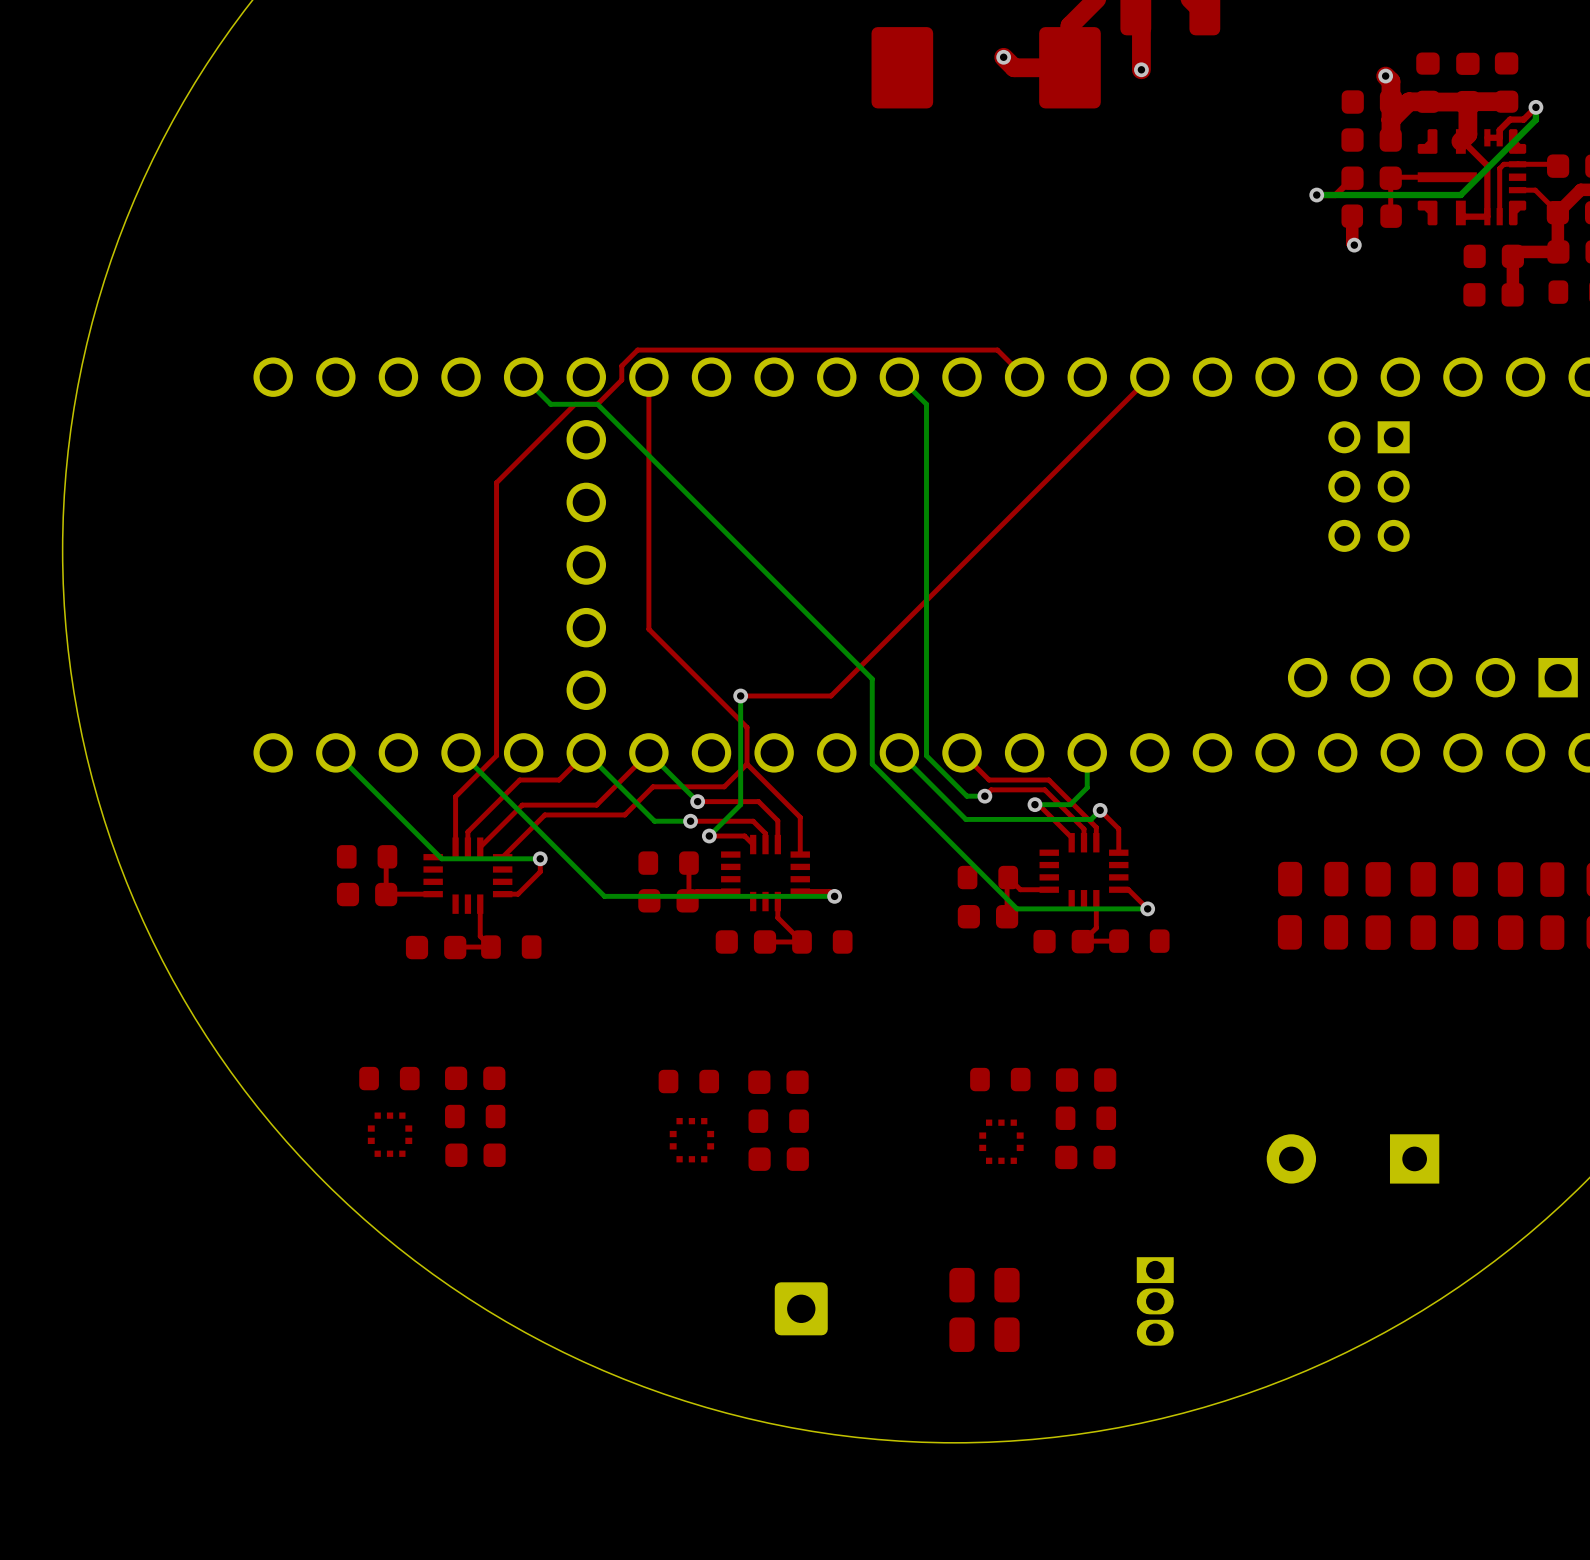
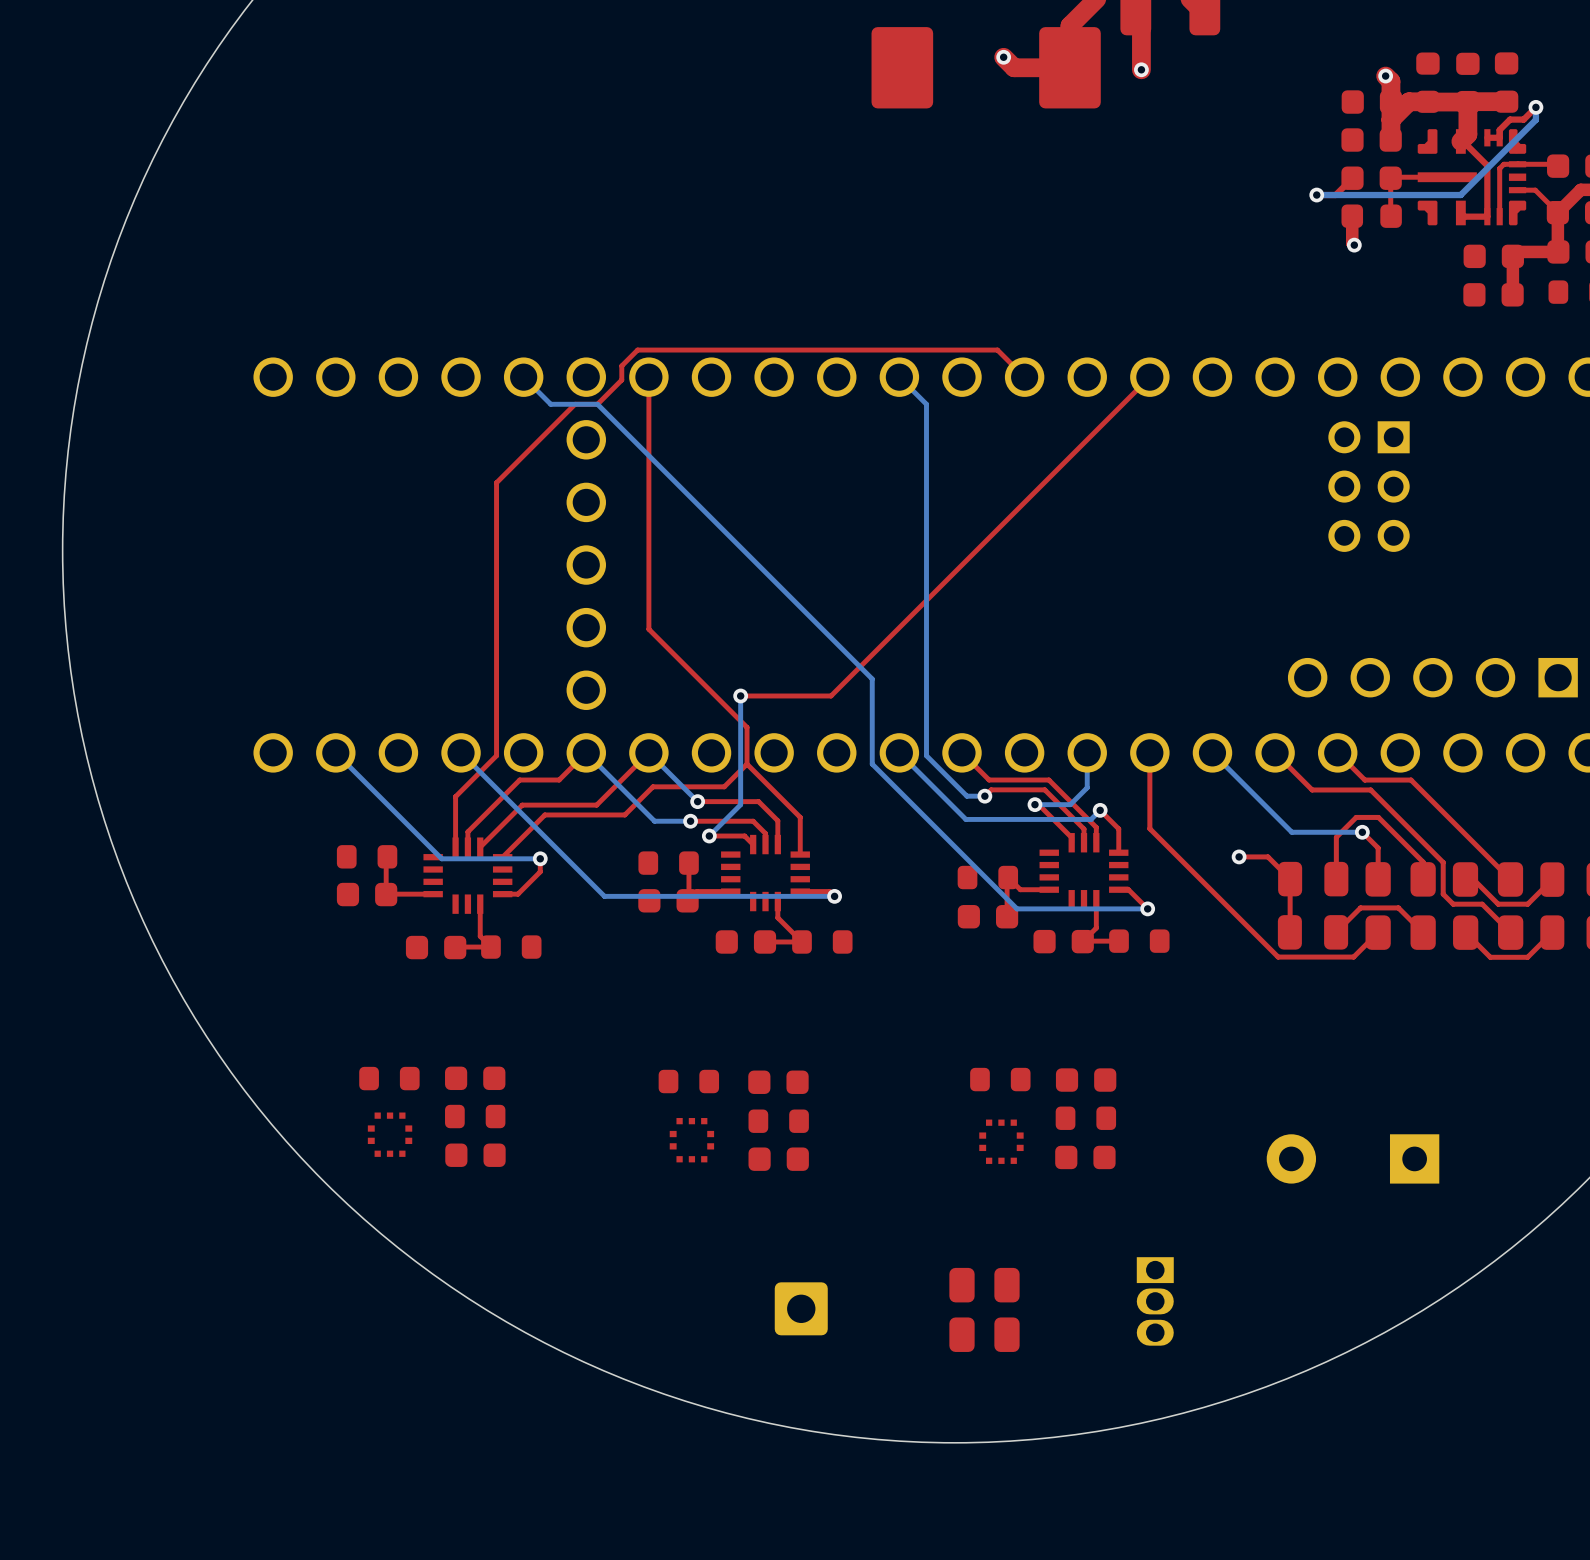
top track: none -> (1149, 752) (1149, 828) (1278, 957) (1353, 957) (1378, 932)
bottom track: none -> (1212, 752) (1291, 832) (1362, 832)
top track: none -> (1275, 752) (1312, 789) (1370, 789) (1443, 862) (1443, 894) (1453, 904) (1482, 904) (1510, 932)
top track: none -> (1337, 752) (1364, 780) (1411, 780) (1510, 879)
top track: none -> (1362, 832) (1378, 848) (1378, 879)
via: none -> (1362, 832)
top track: none -> (1239, 856) (1267, 856) (1290, 879) (1290, 932)
via: none -> (1239, 856)
top track: none -> (1336, 879) (1336, 837) (1356, 817) (1378, 817) (1423, 862) (1423, 879)
top track: none -> (1552, 879) (1527, 904) (1498, 904) (1473, 879) (1465, 879)
top track: none -> (1336, 932) (1360, 907) (1398, 907) (1423, 932)
top track: none -> (1552, 932) (1527, 957) (1490, 957) (1465, 932)

